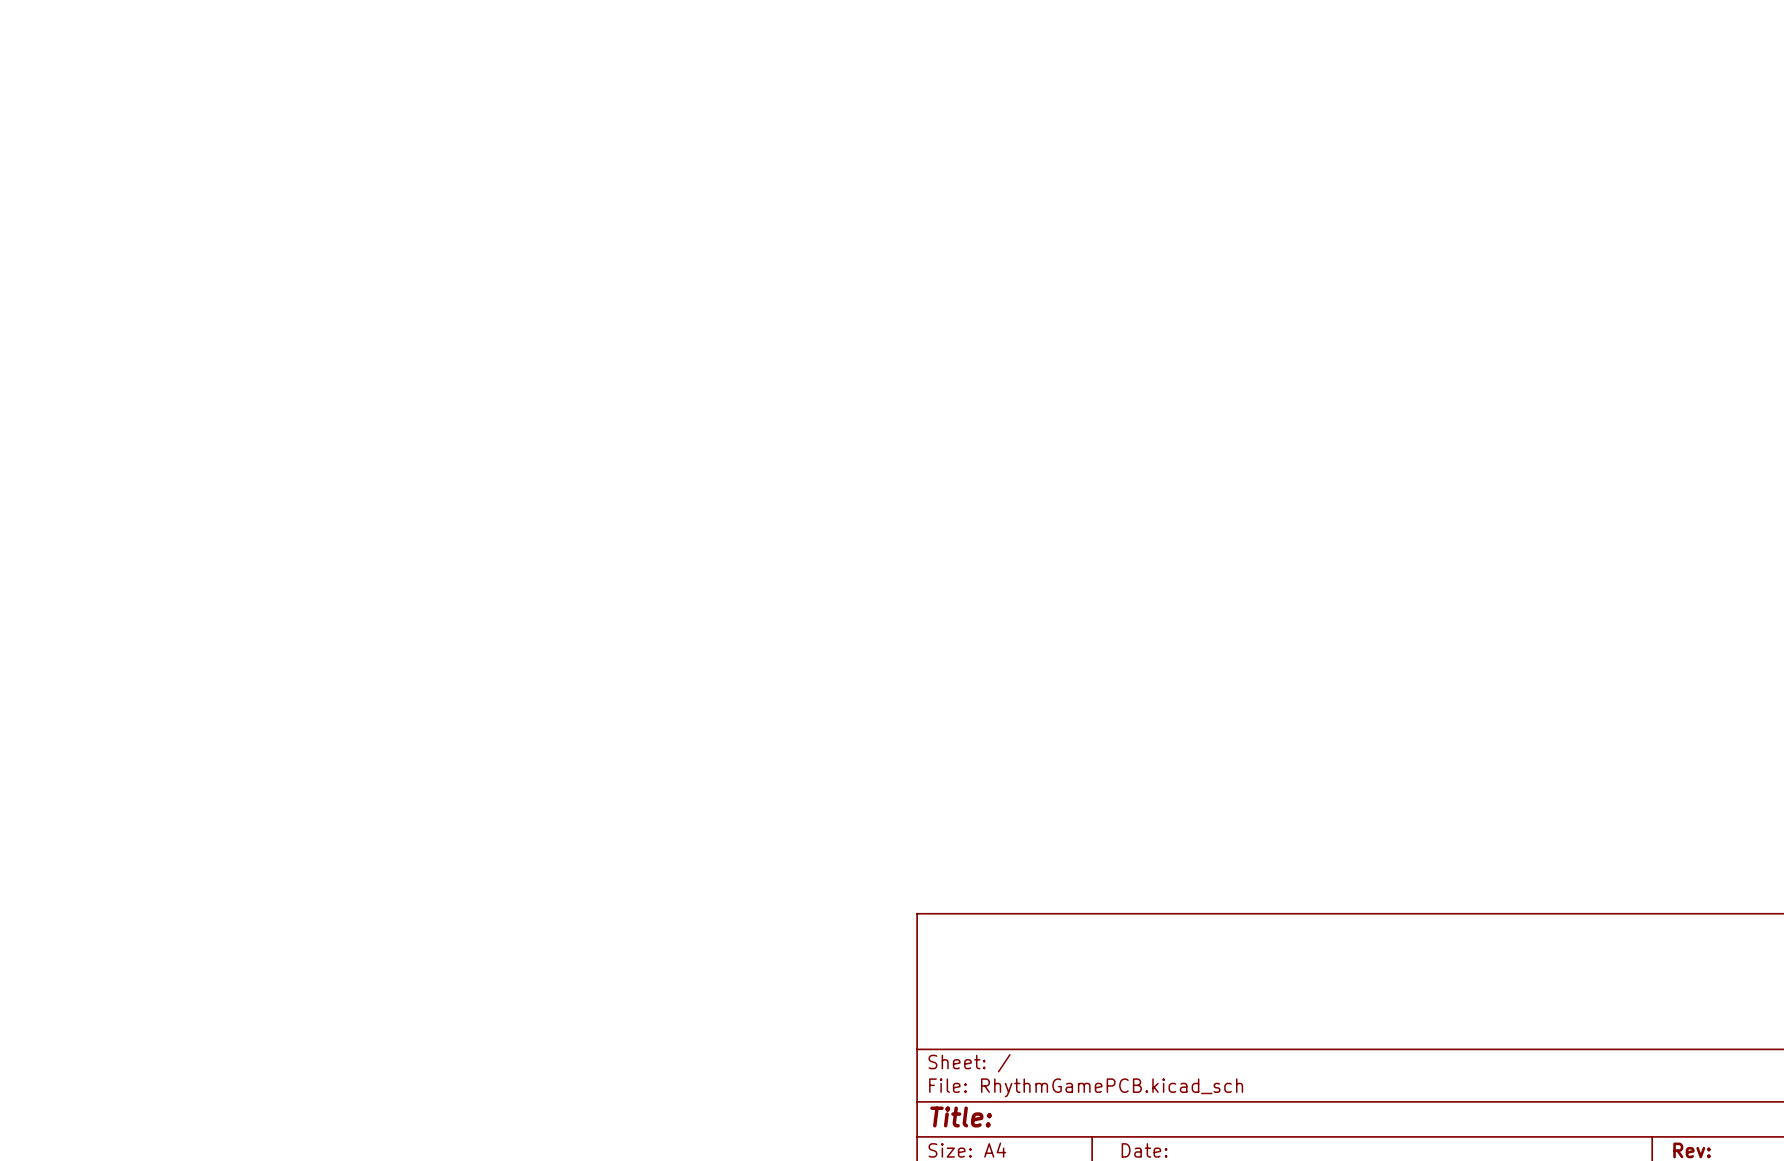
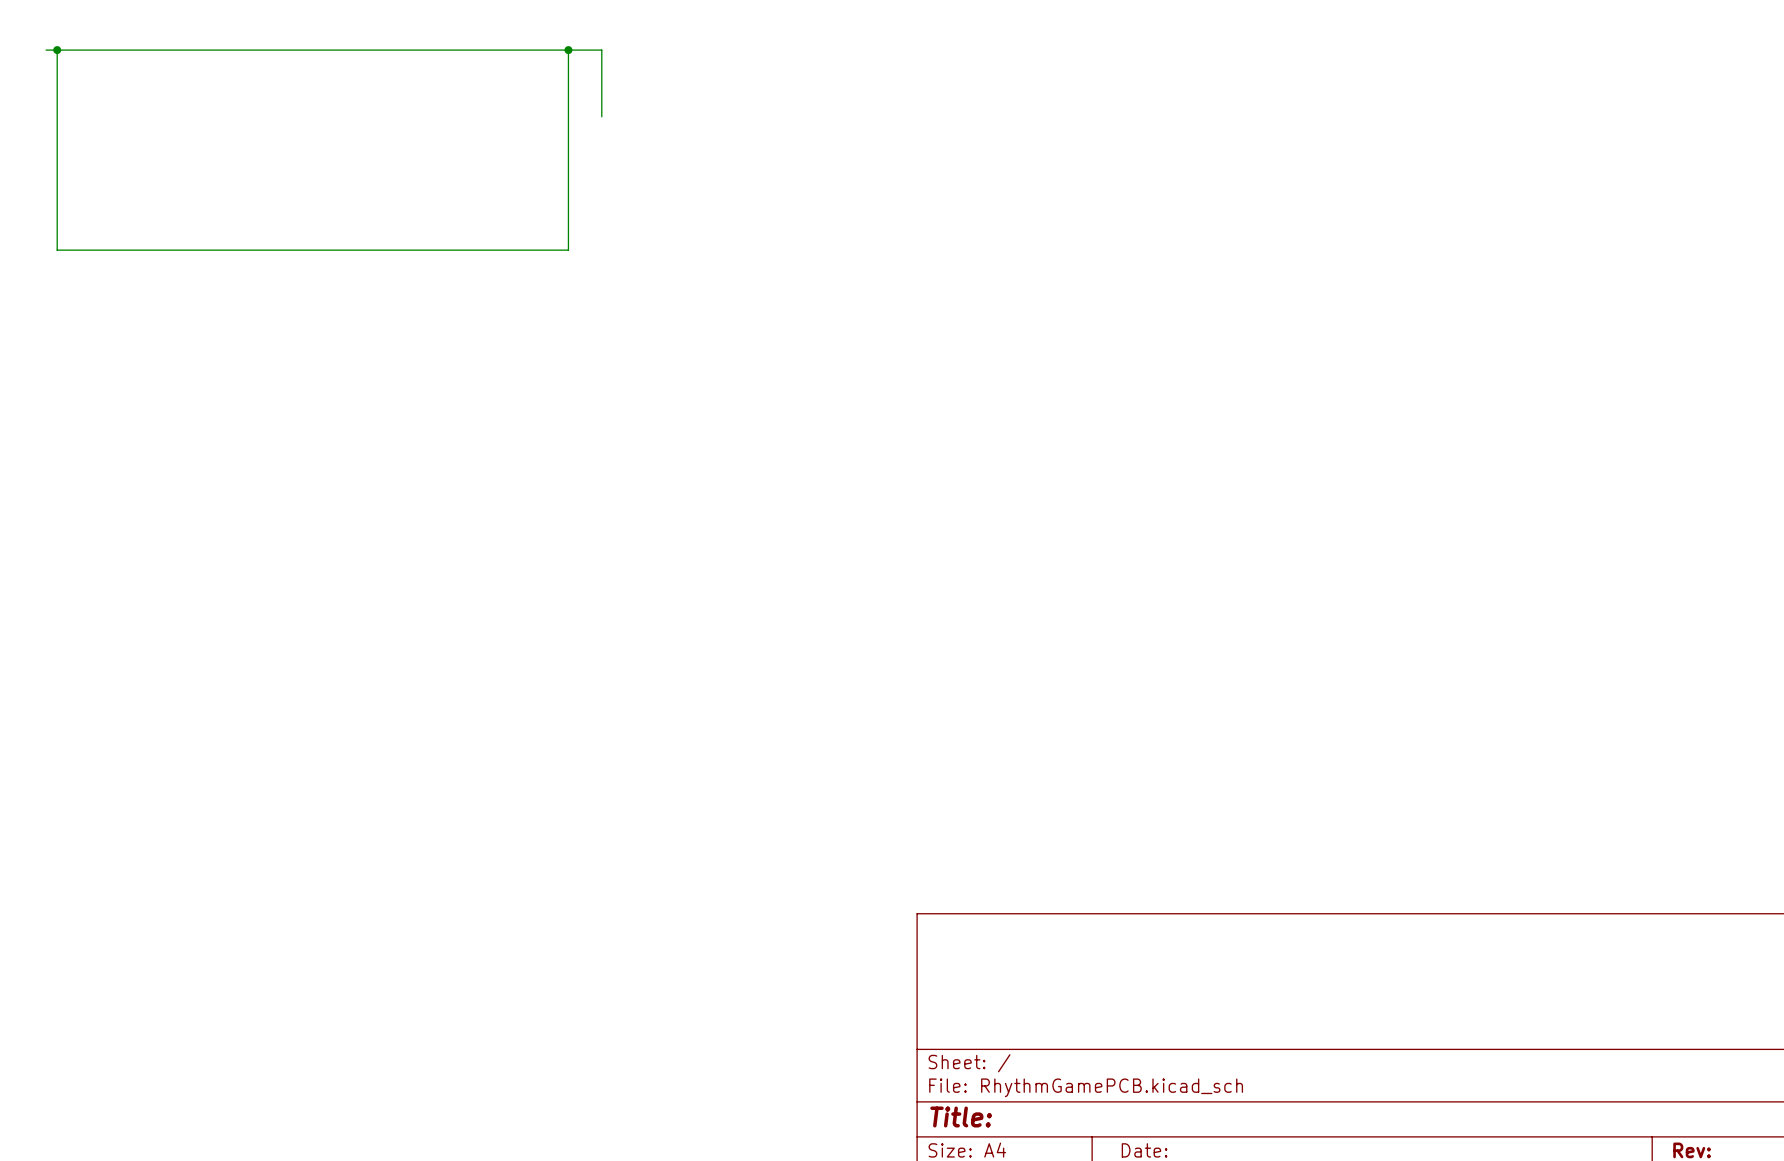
wire: none -> (46, 50) (601, 50) (601, 116)
wire: none -> (57, 50) (57, 250) (568, 250) (568, 50)
junction: none -> (57, 50)
junction: none -> (568, 50)

